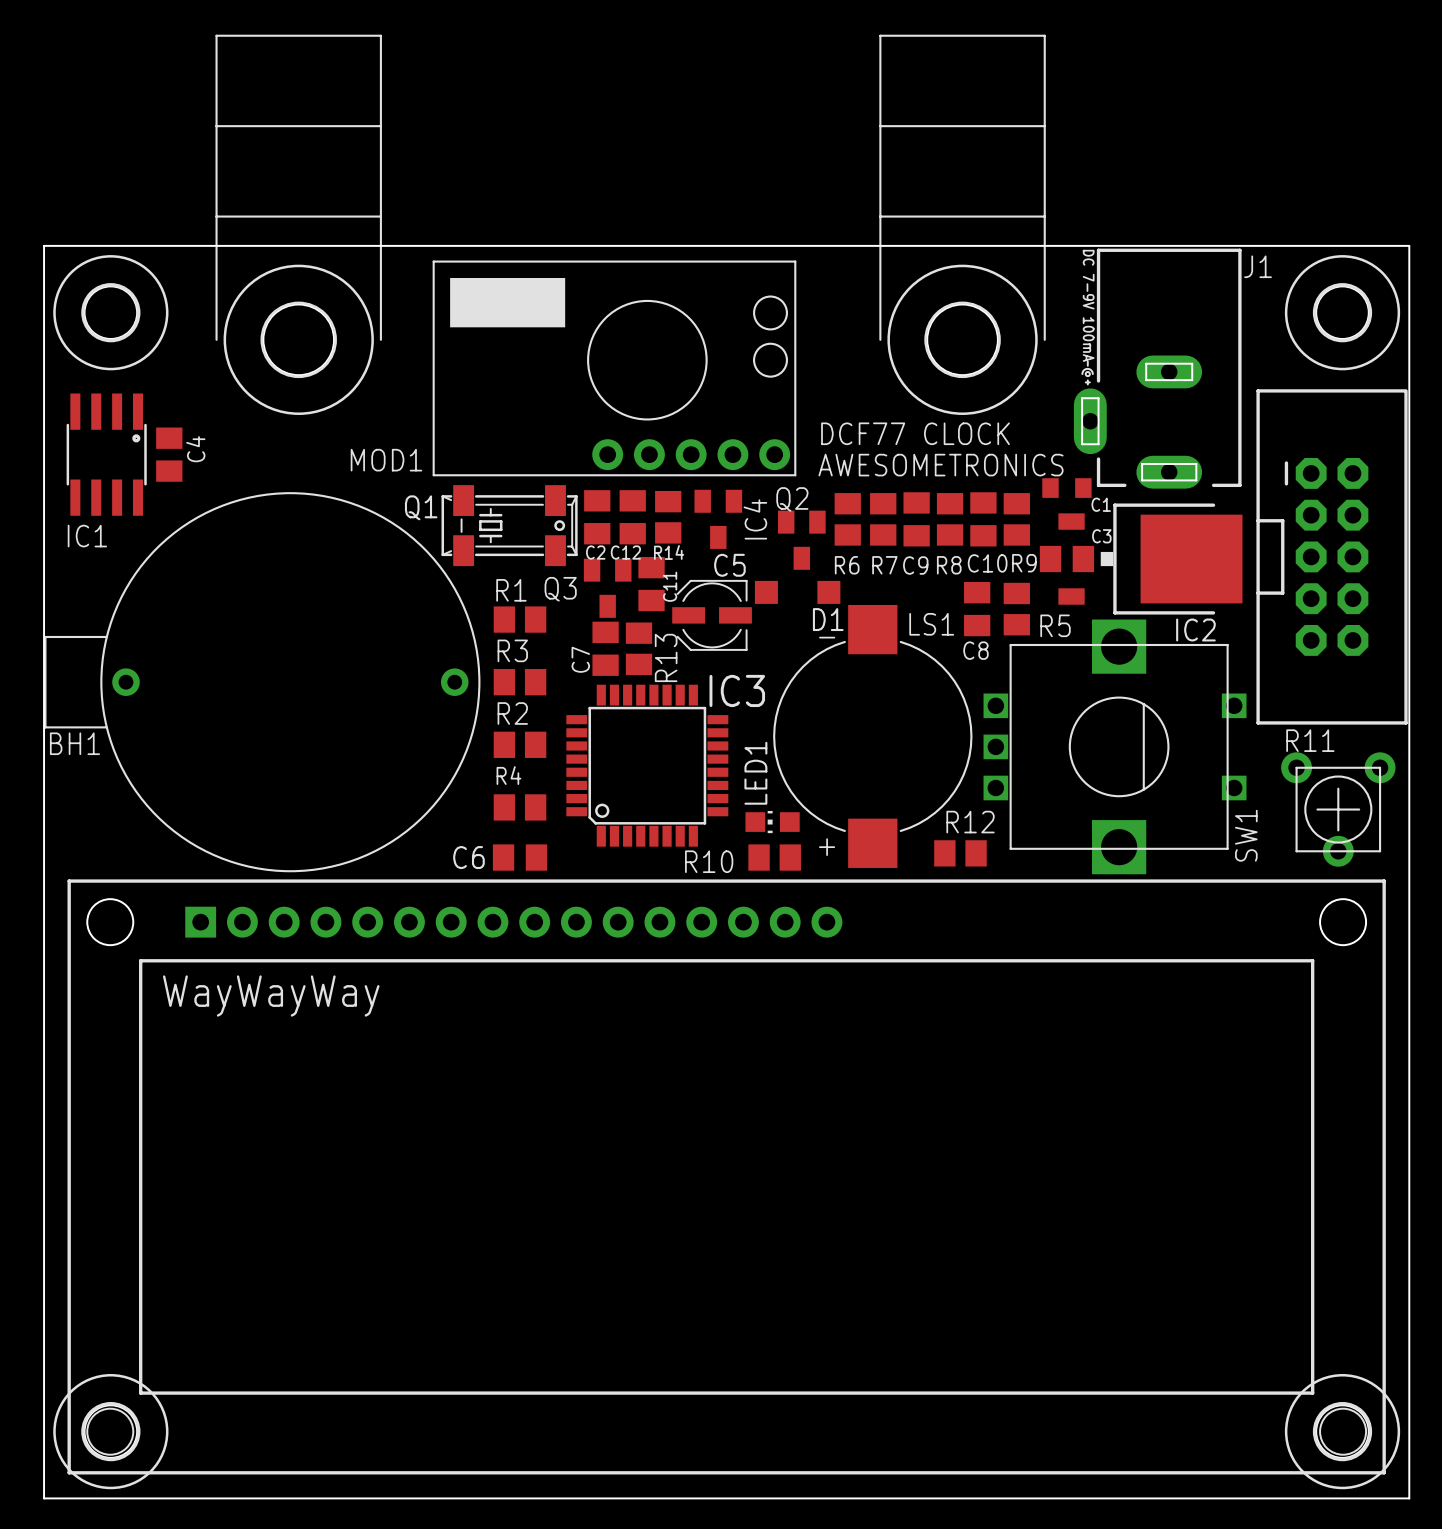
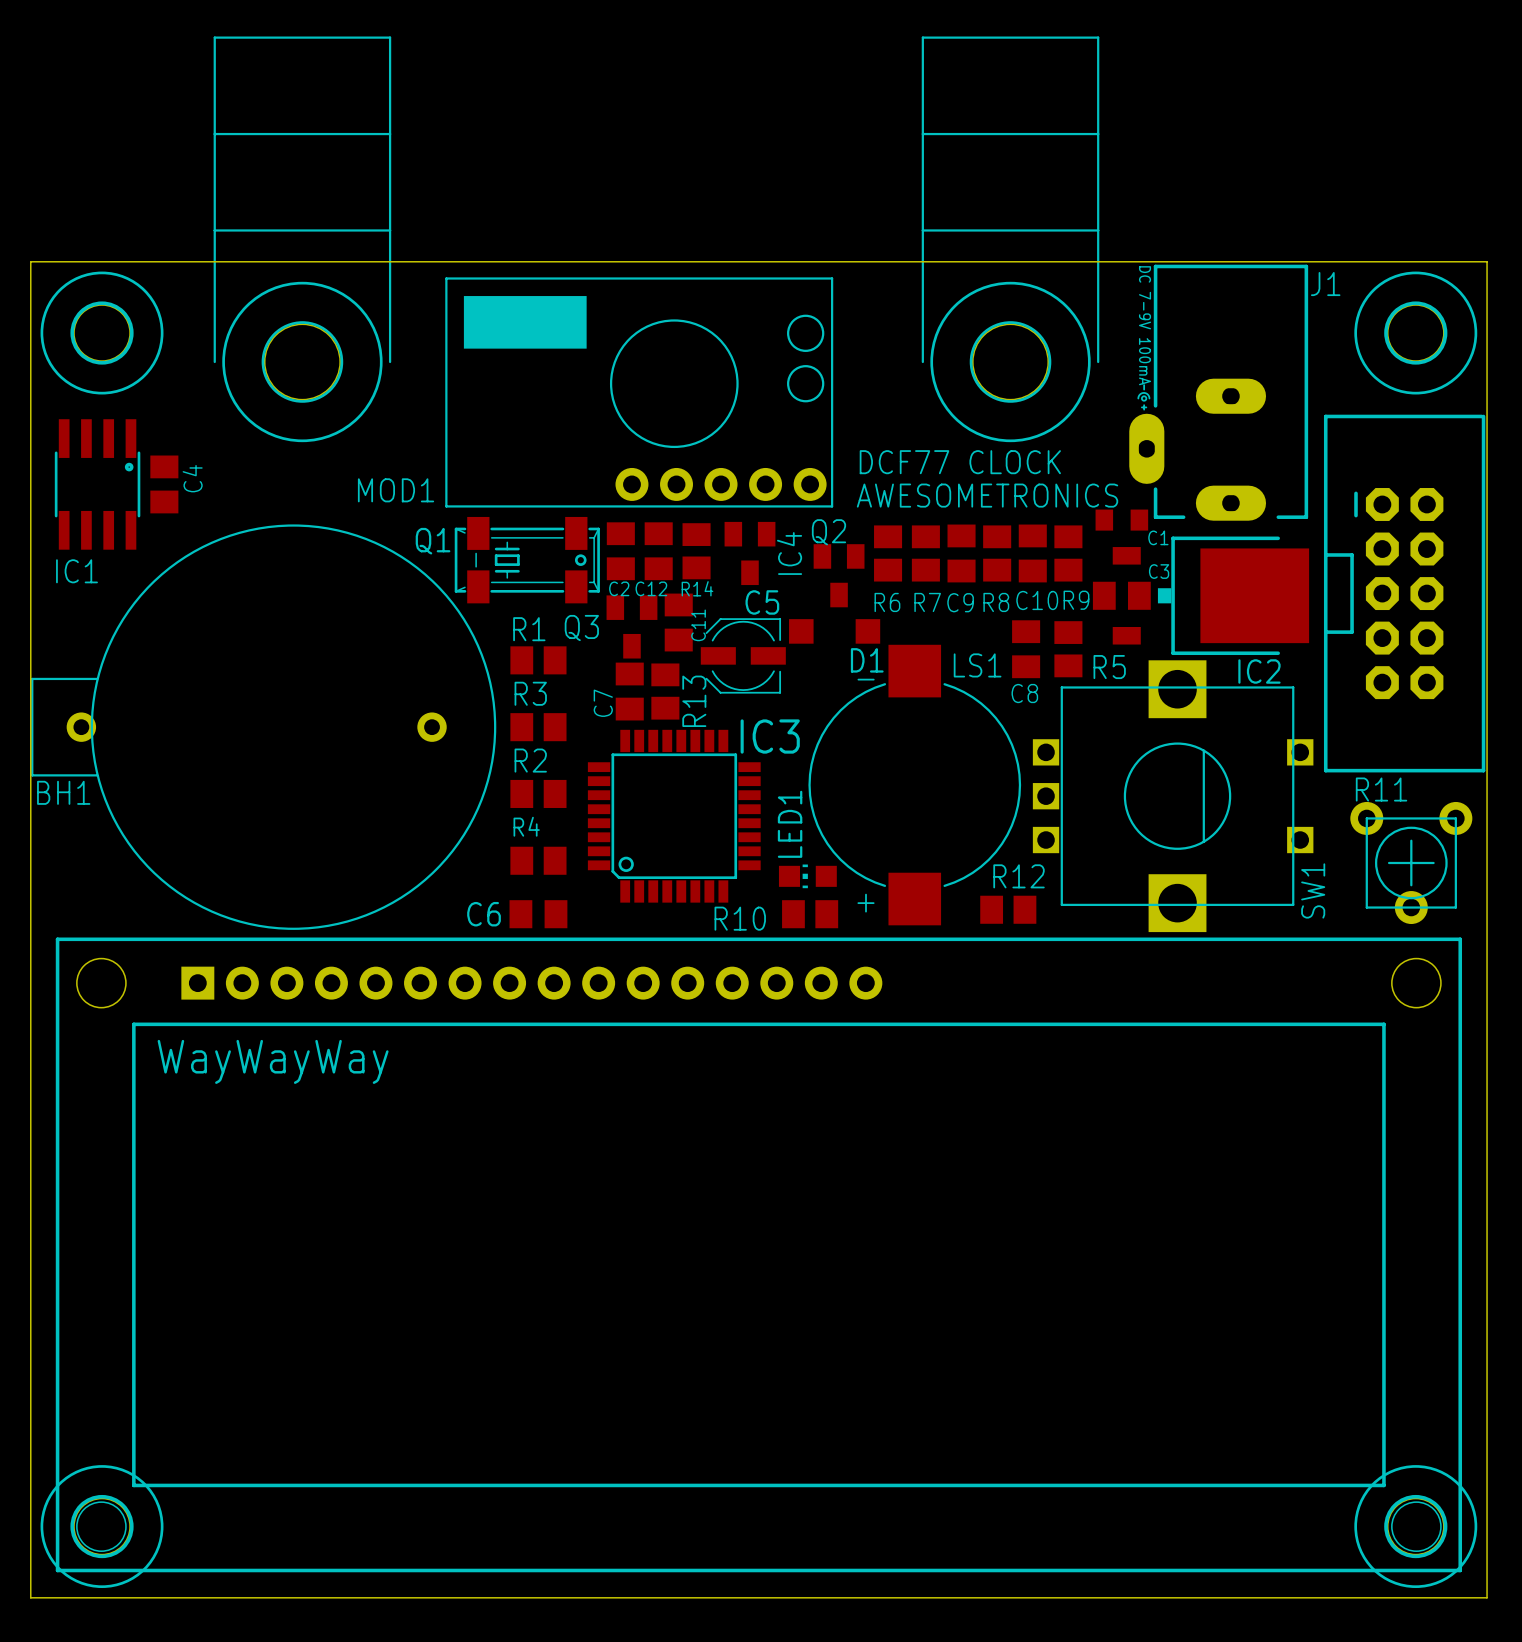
BH1 footprint: [44, 492, 481, 873] -> [31, 524, 497, 930]

